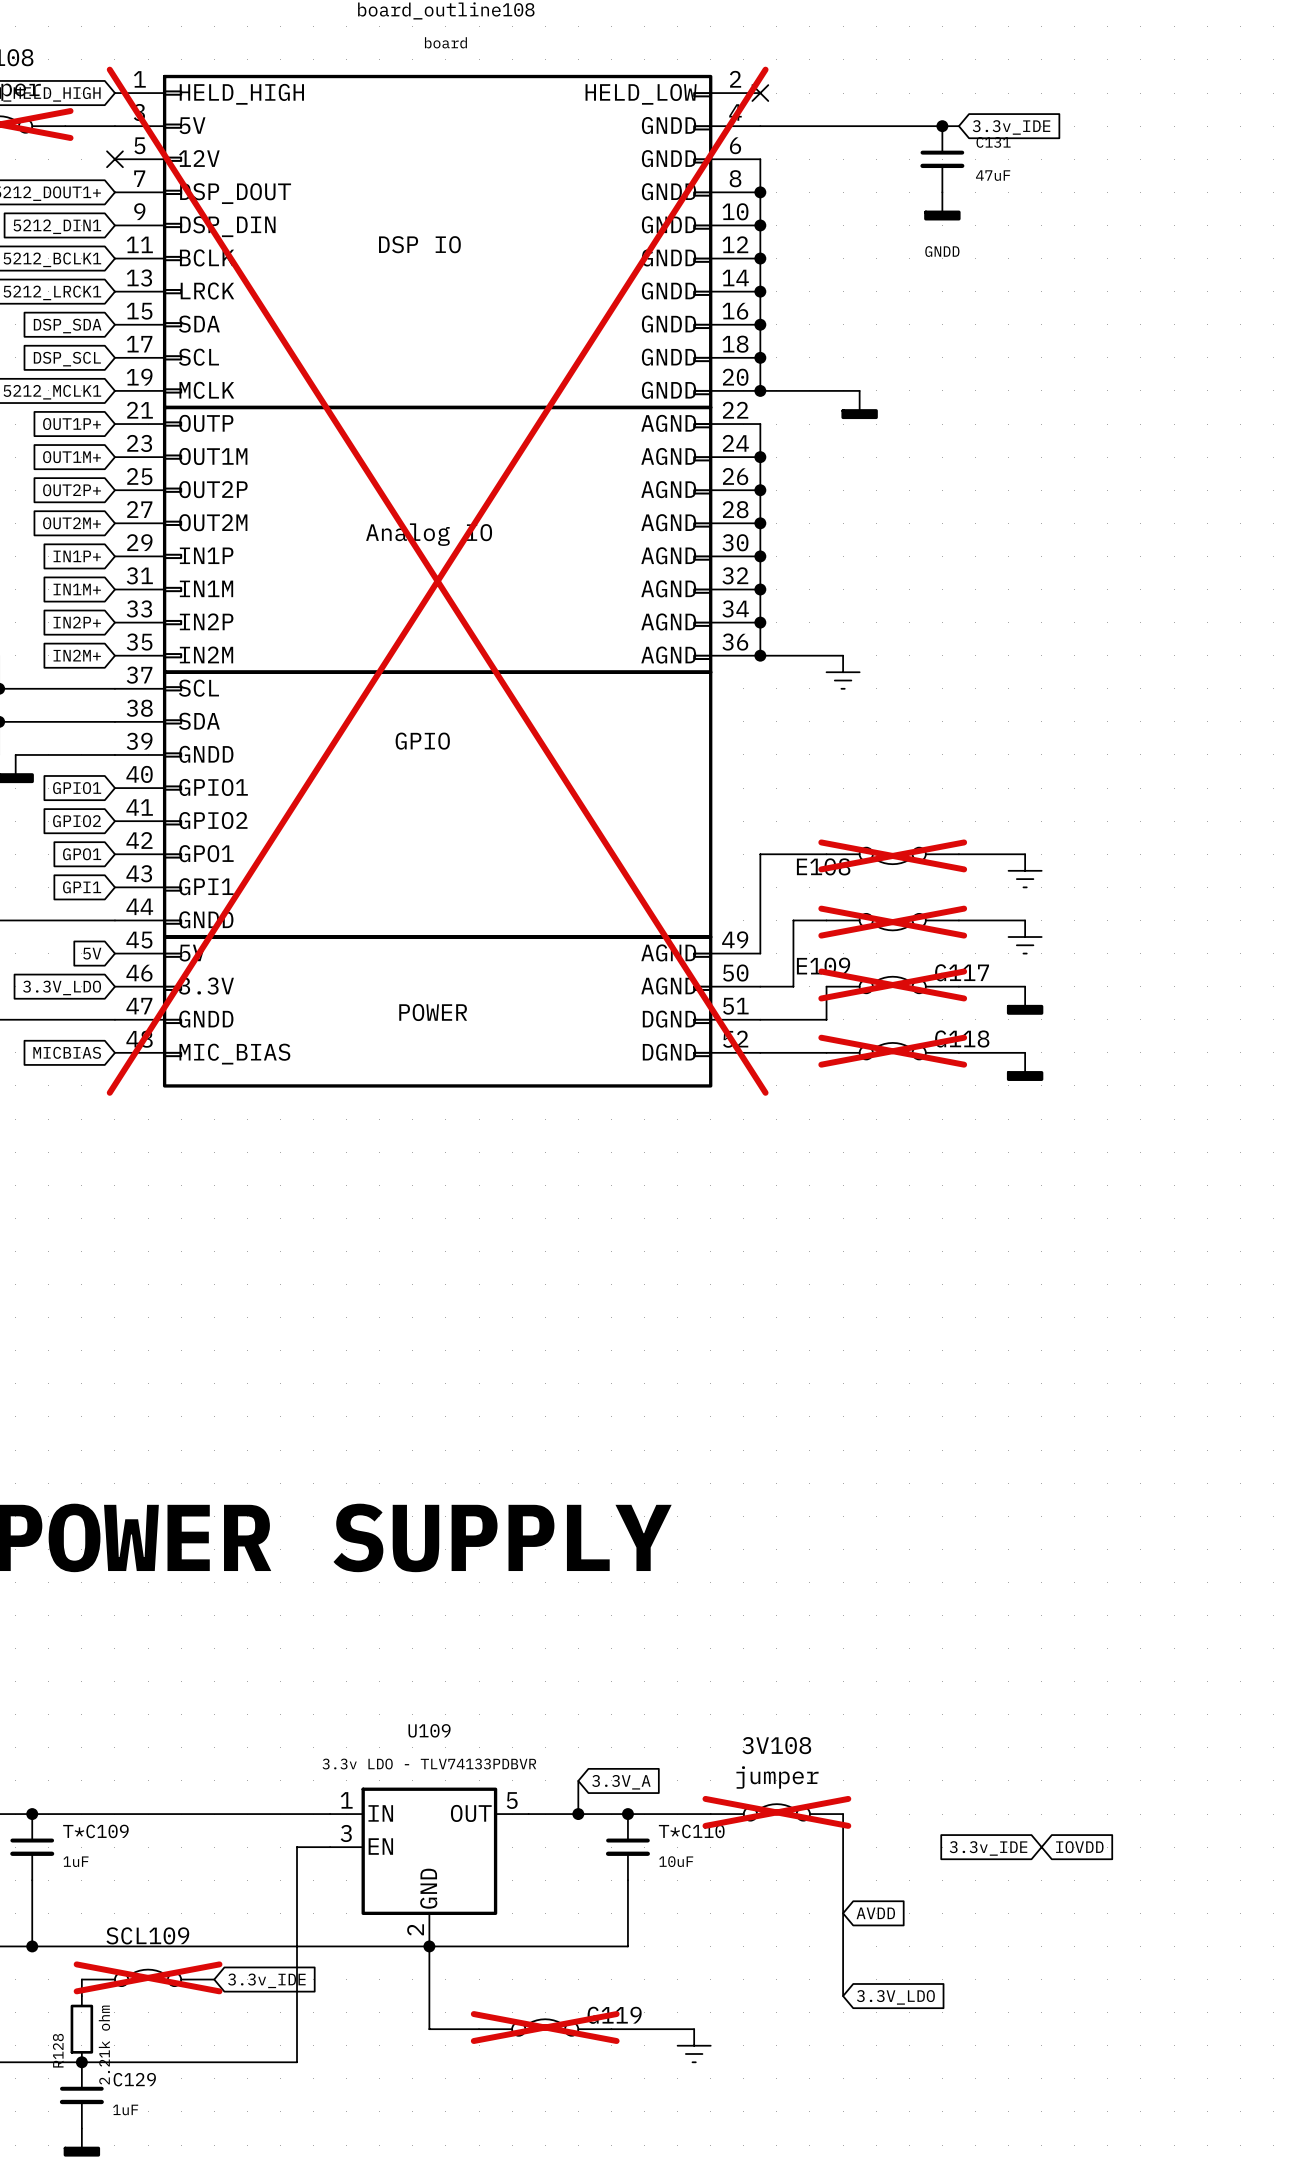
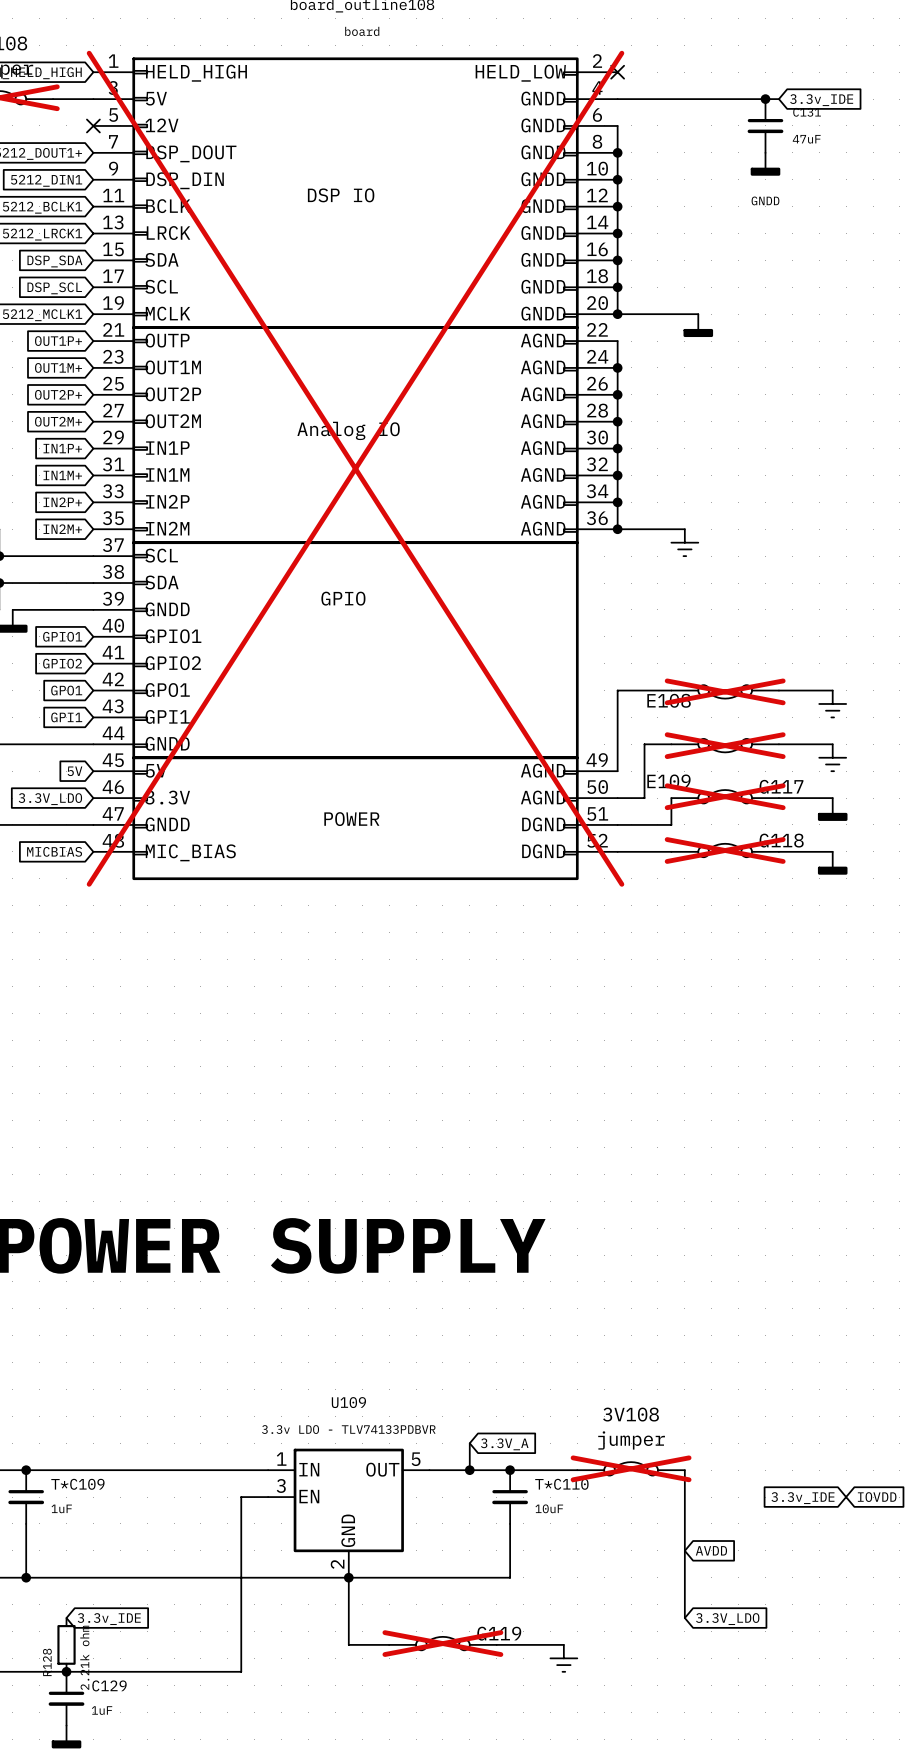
SCL109: (148, 1977) -> none
wire: (81, 1979) (81, 1996) -> none
global label position: 3.3v_IDE (266, 1980) -> 3.3v_IDE (109, 1619)

